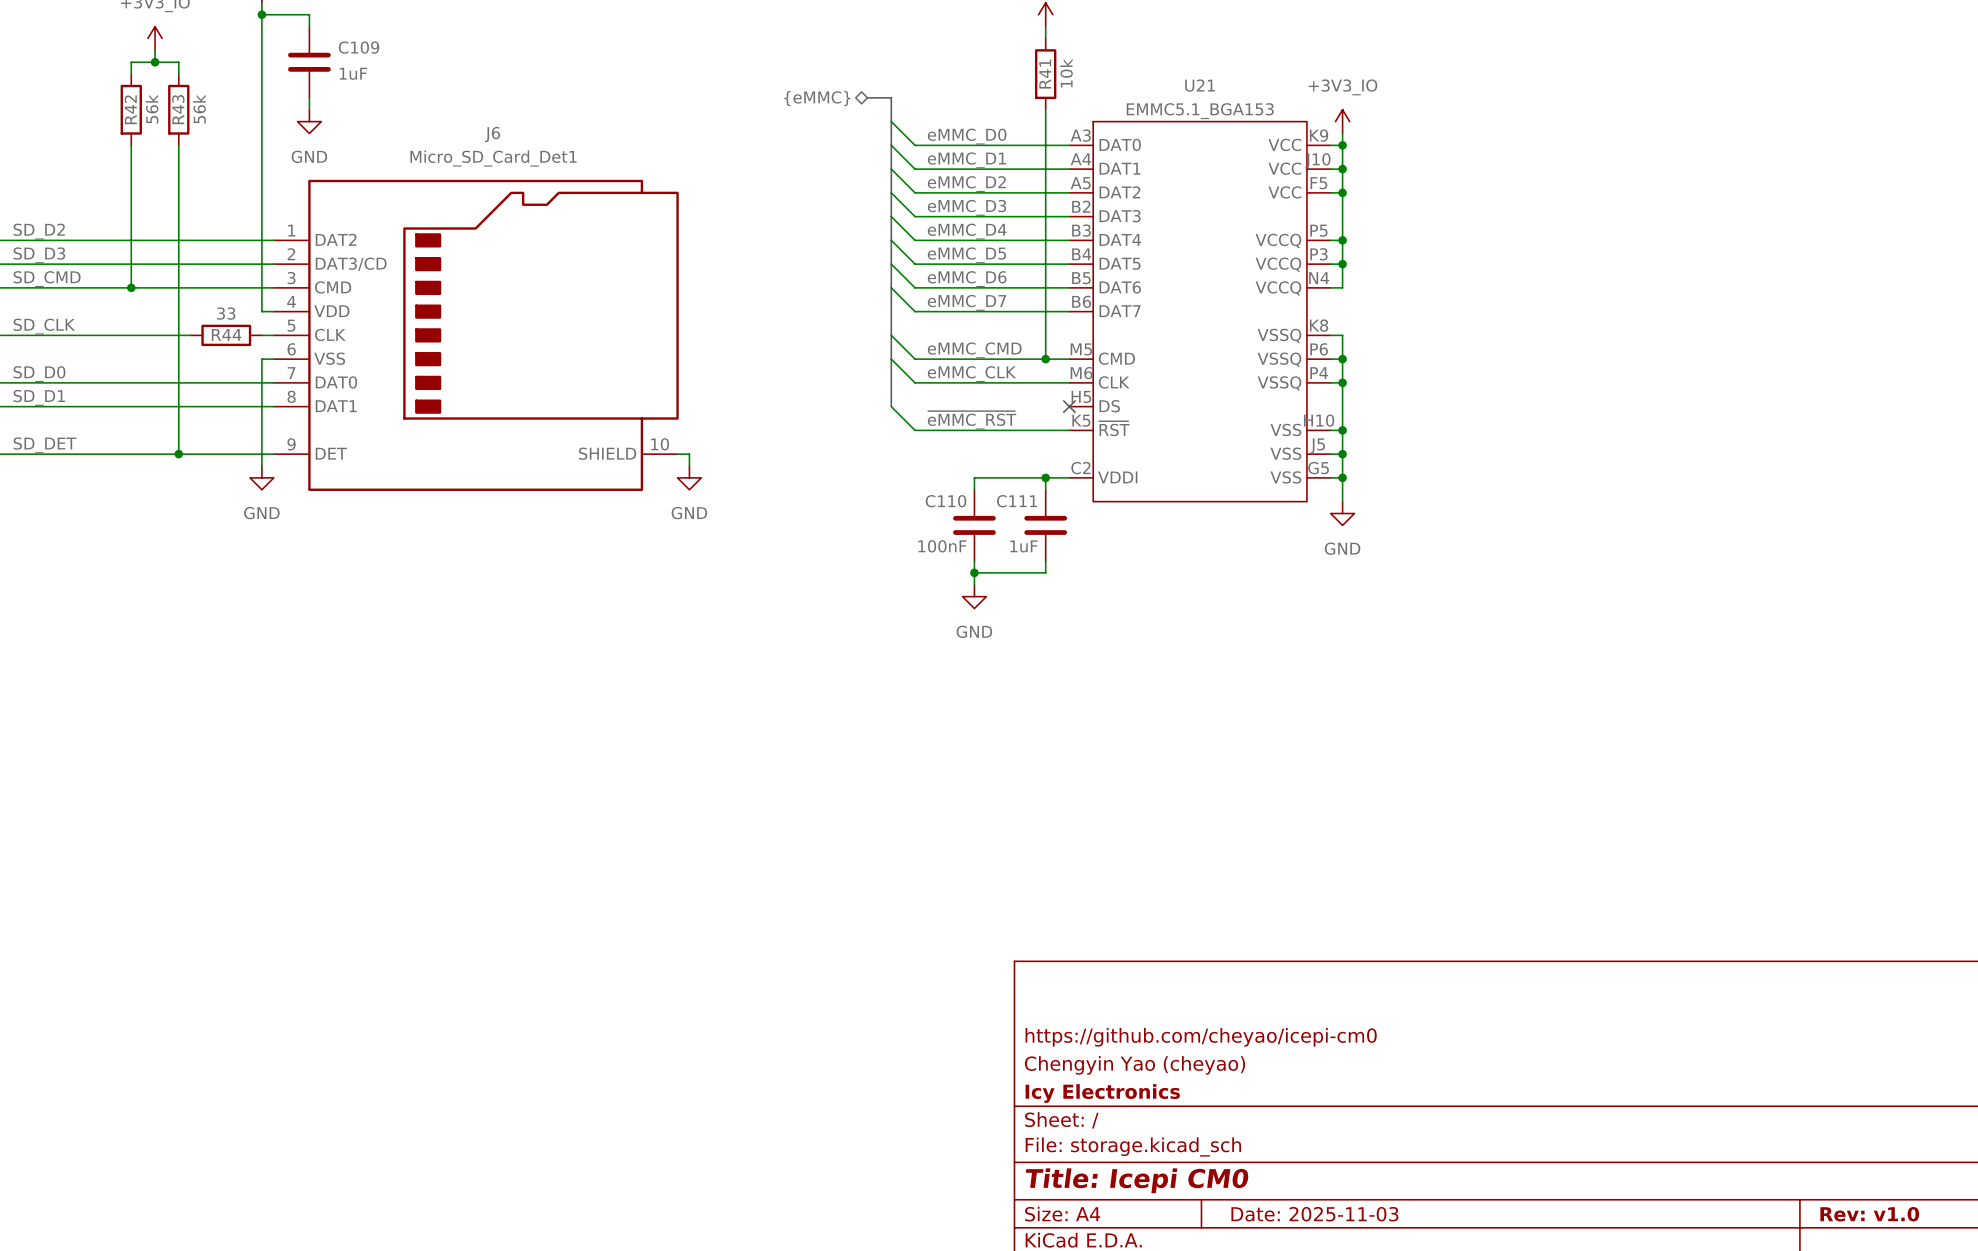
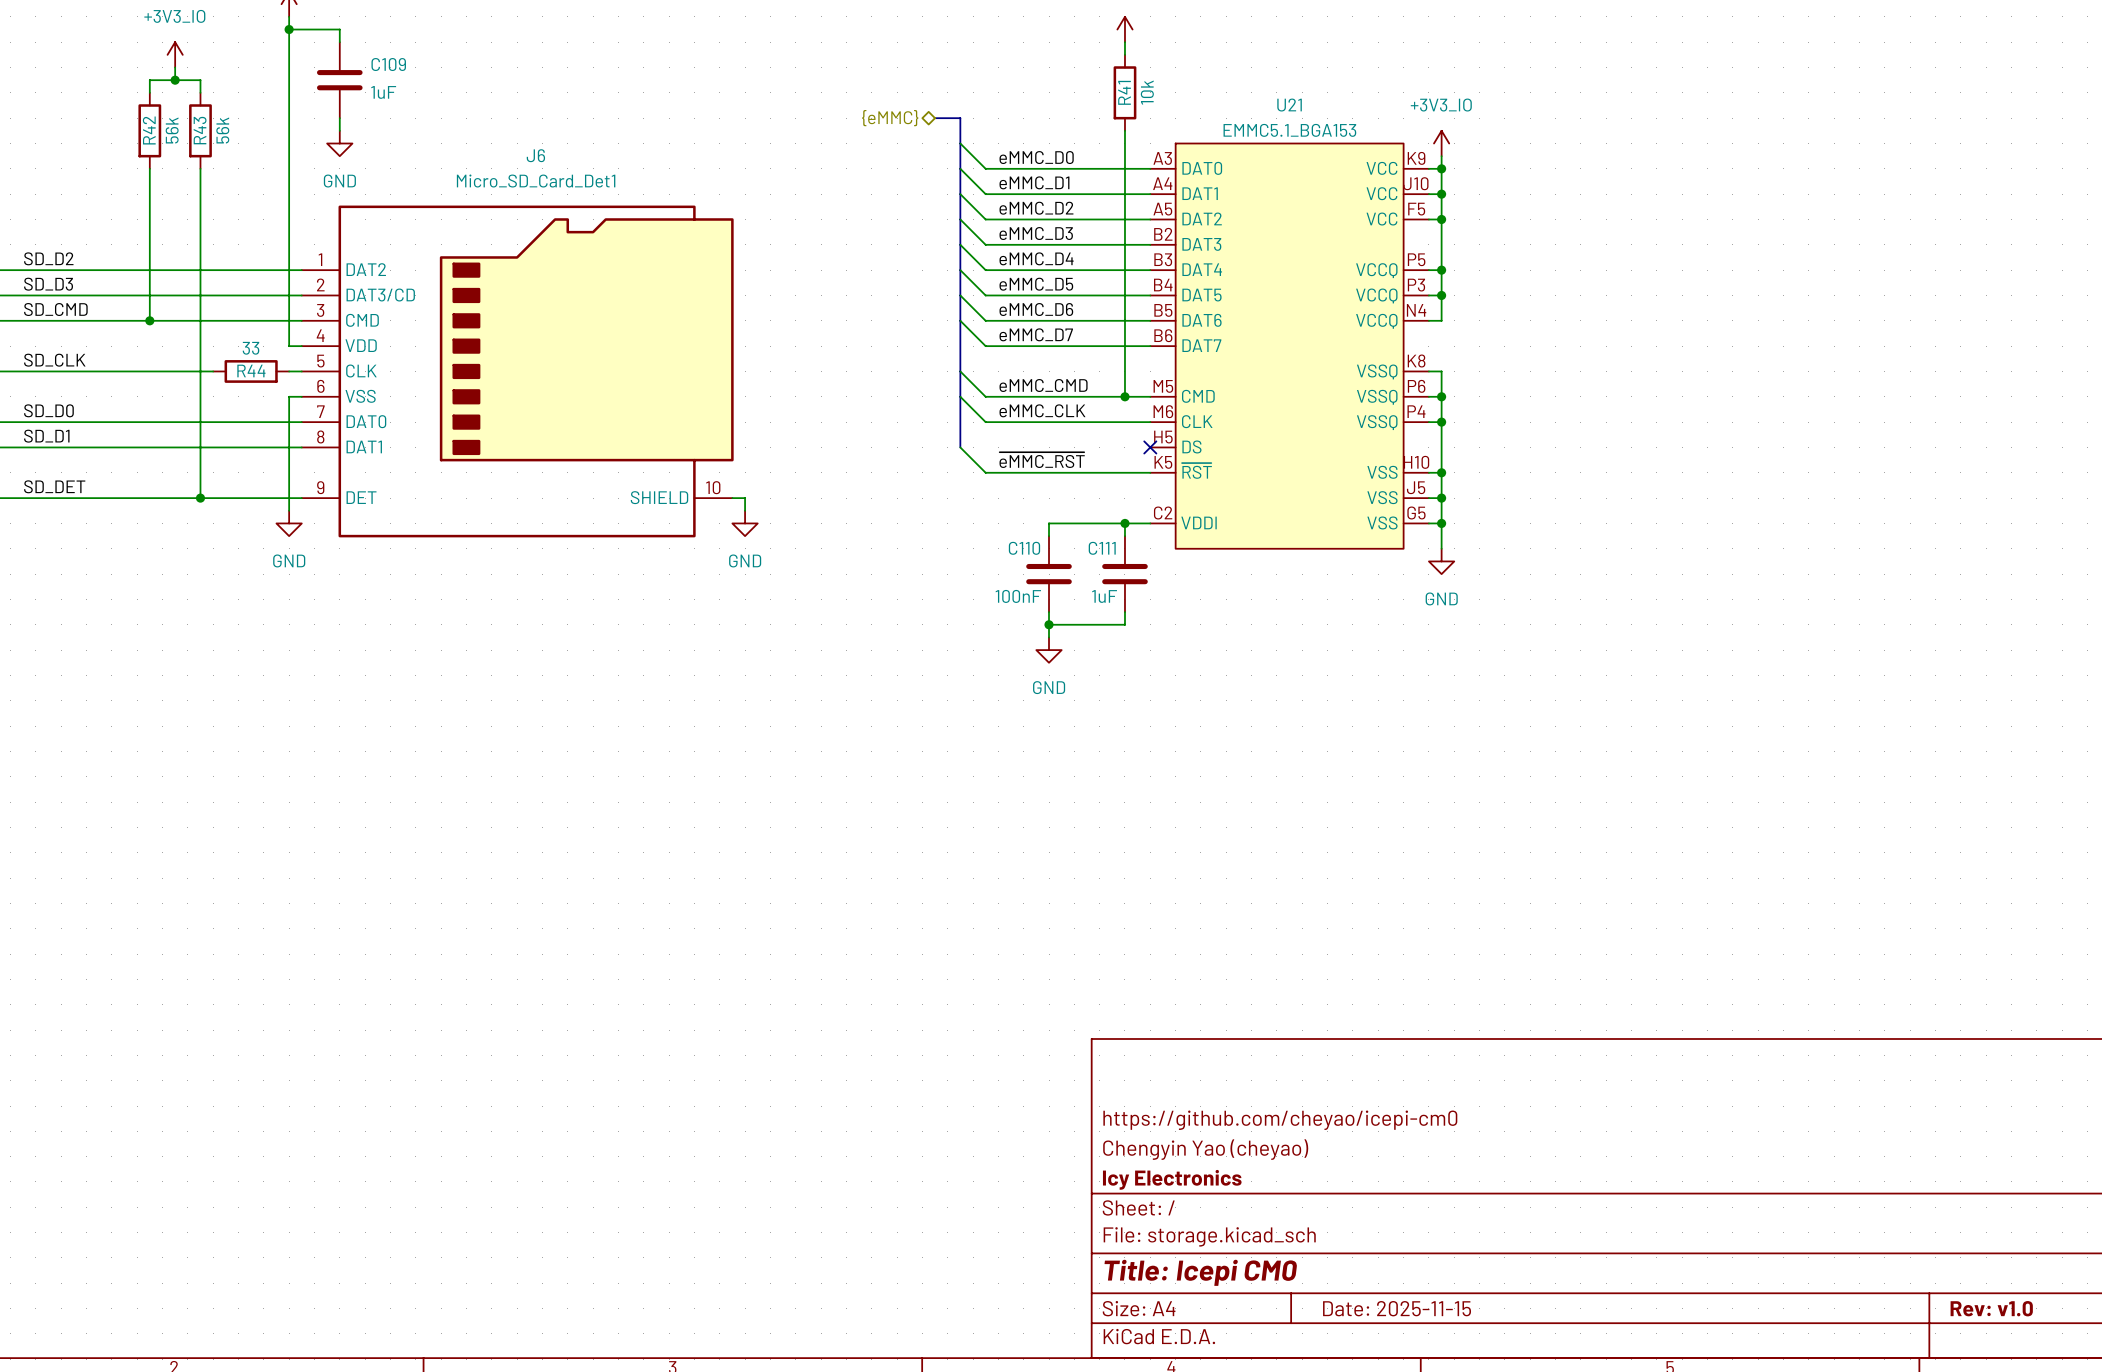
title block: Date: 2025-11-03 (1314, 1214) -> Date: 2025-11-15 (1397, 1308)

